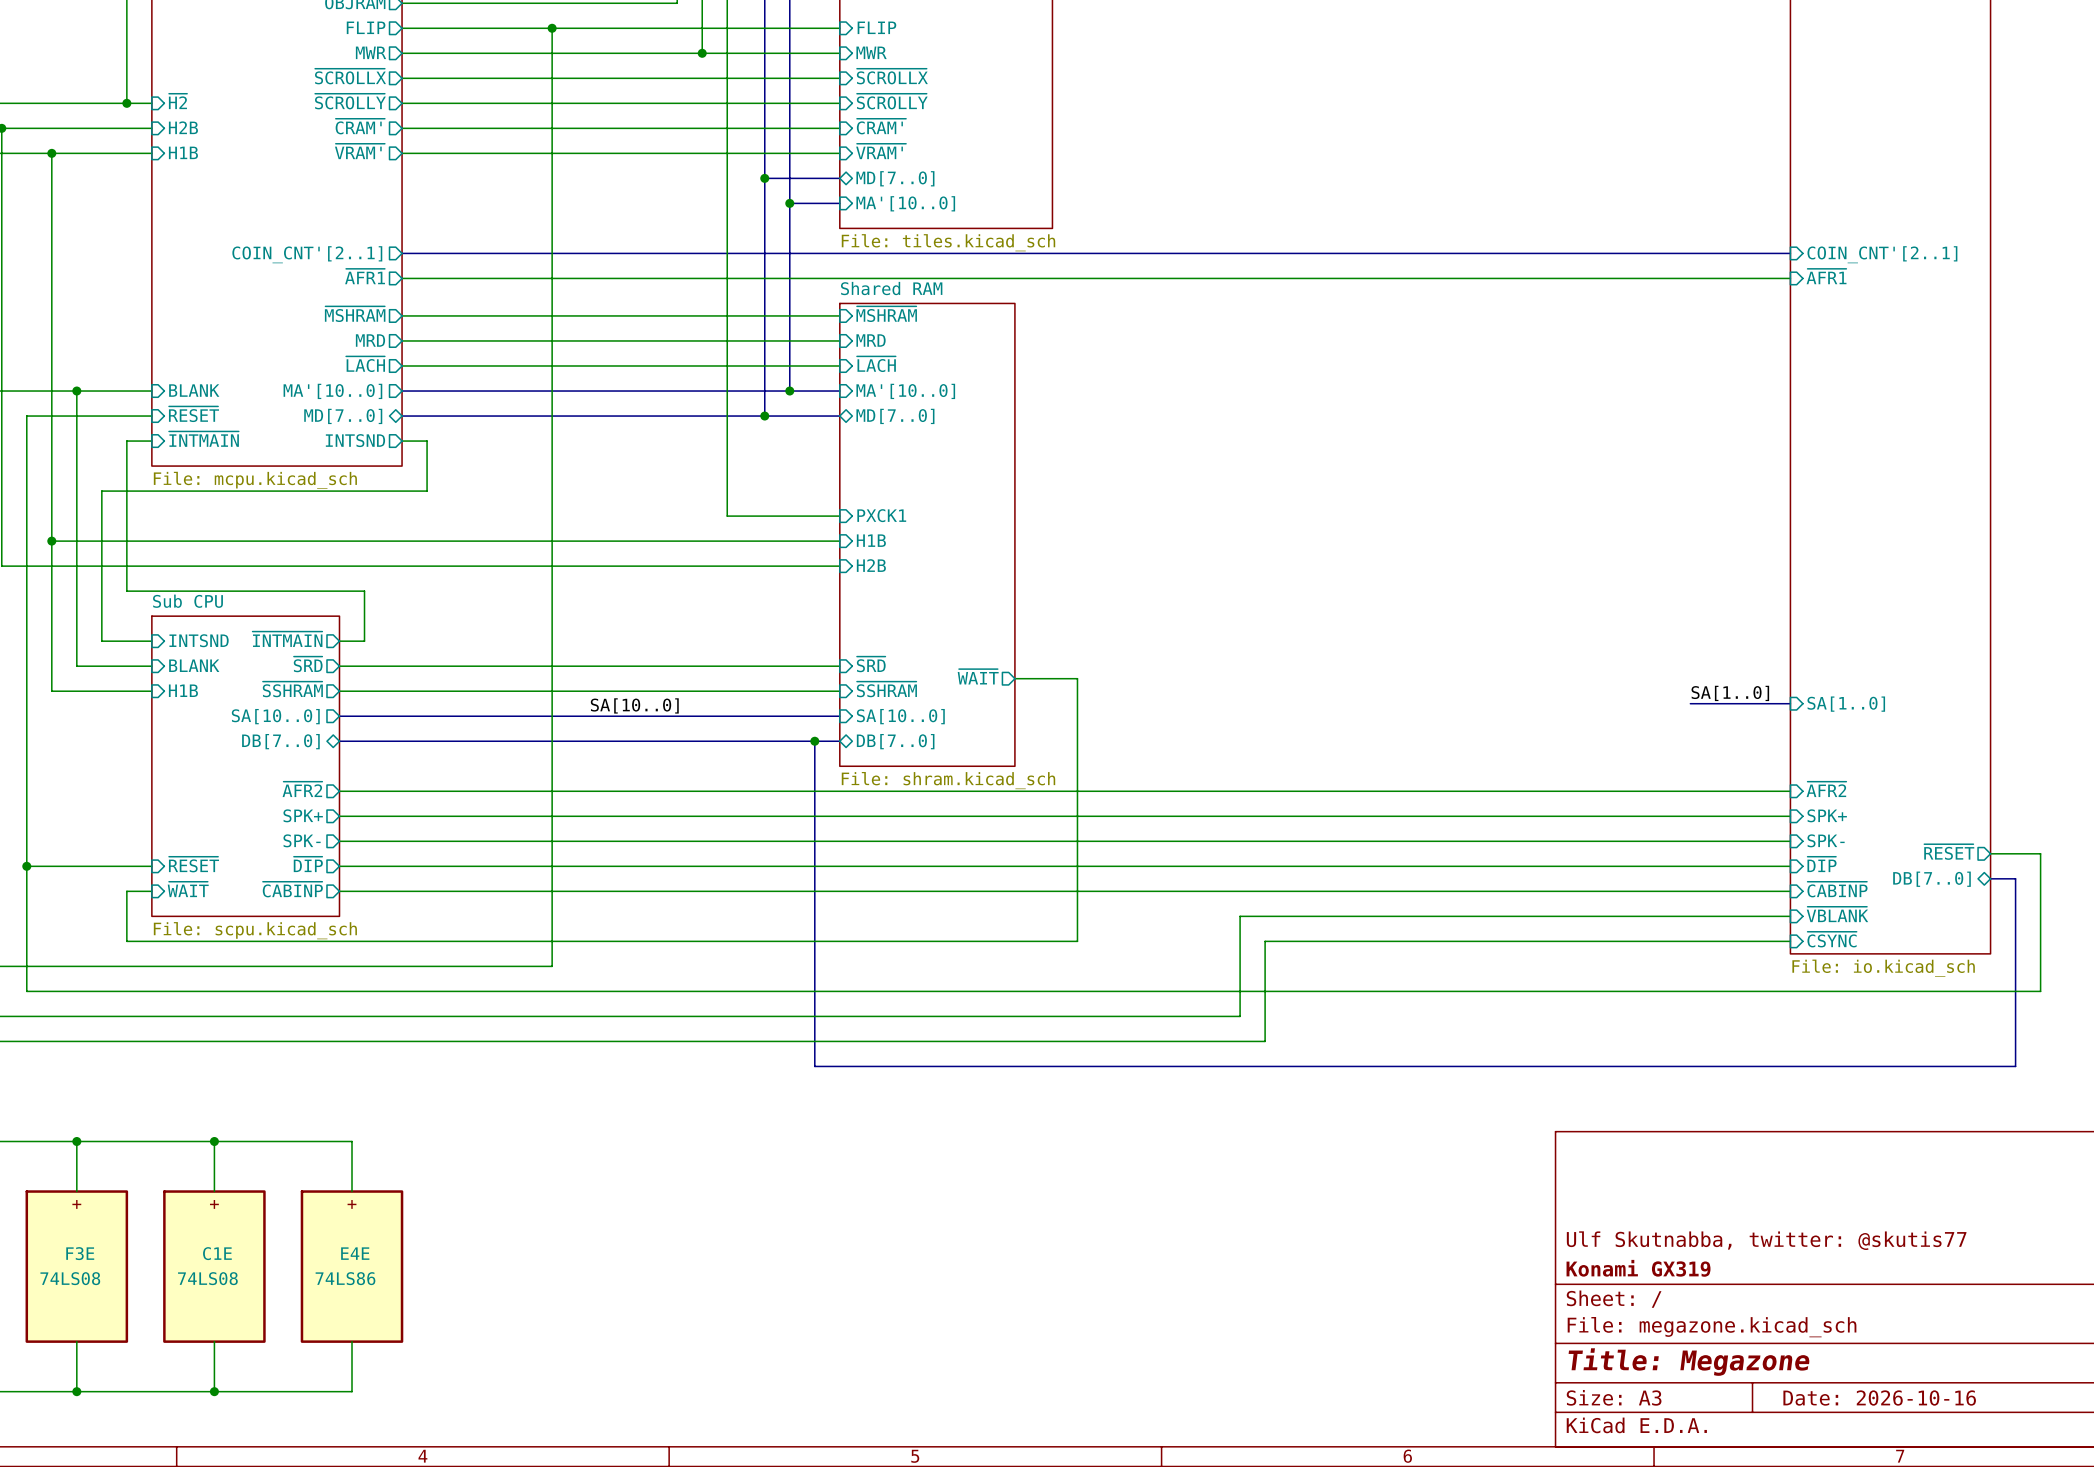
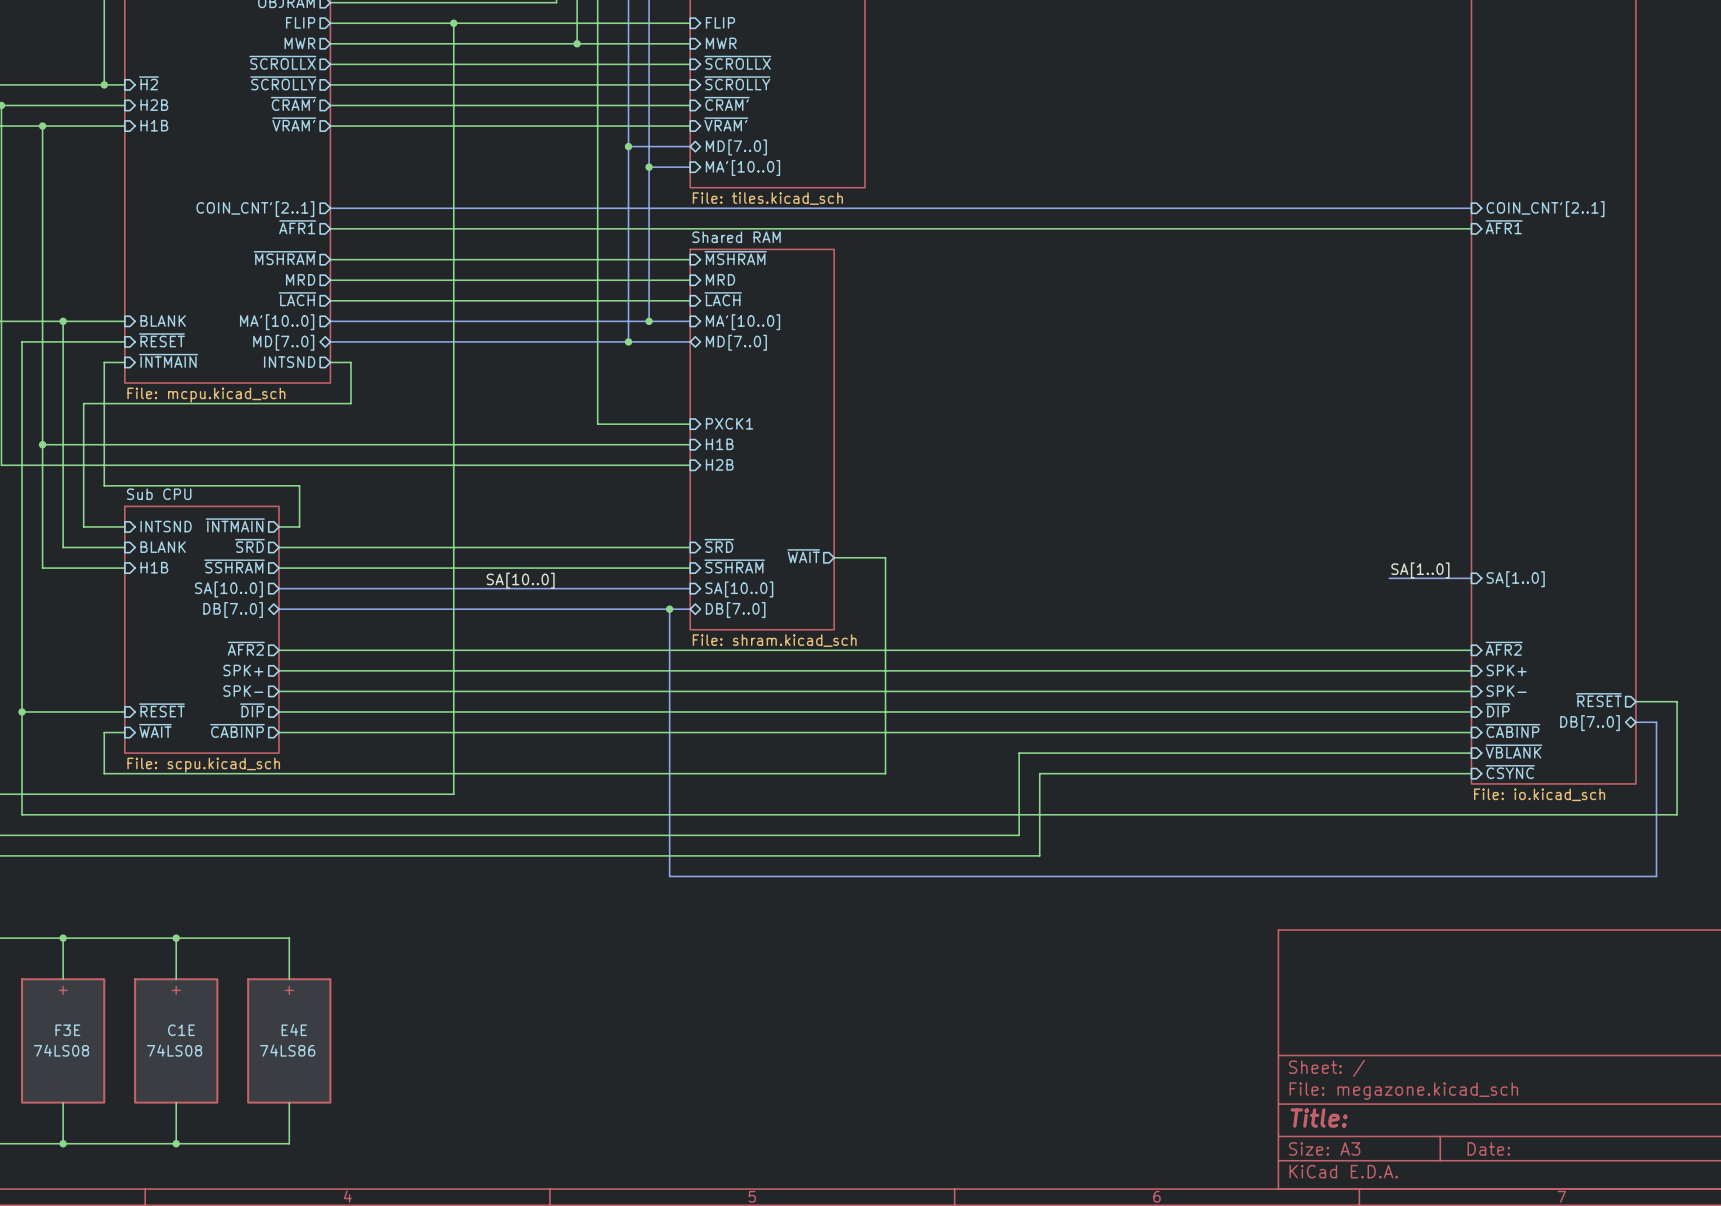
title block: Ulf Skutnabba, twitter: @skutis77 (1766, 1240) -> none
title block: Konami GX319 (1638, 1268) -> none
title block: Title: Megazone (1689, 1362) -> Title: (1319, 1118)
title block: Date: 2026-10-16 (1879, 1398) -> Date: (1488, 1148)

